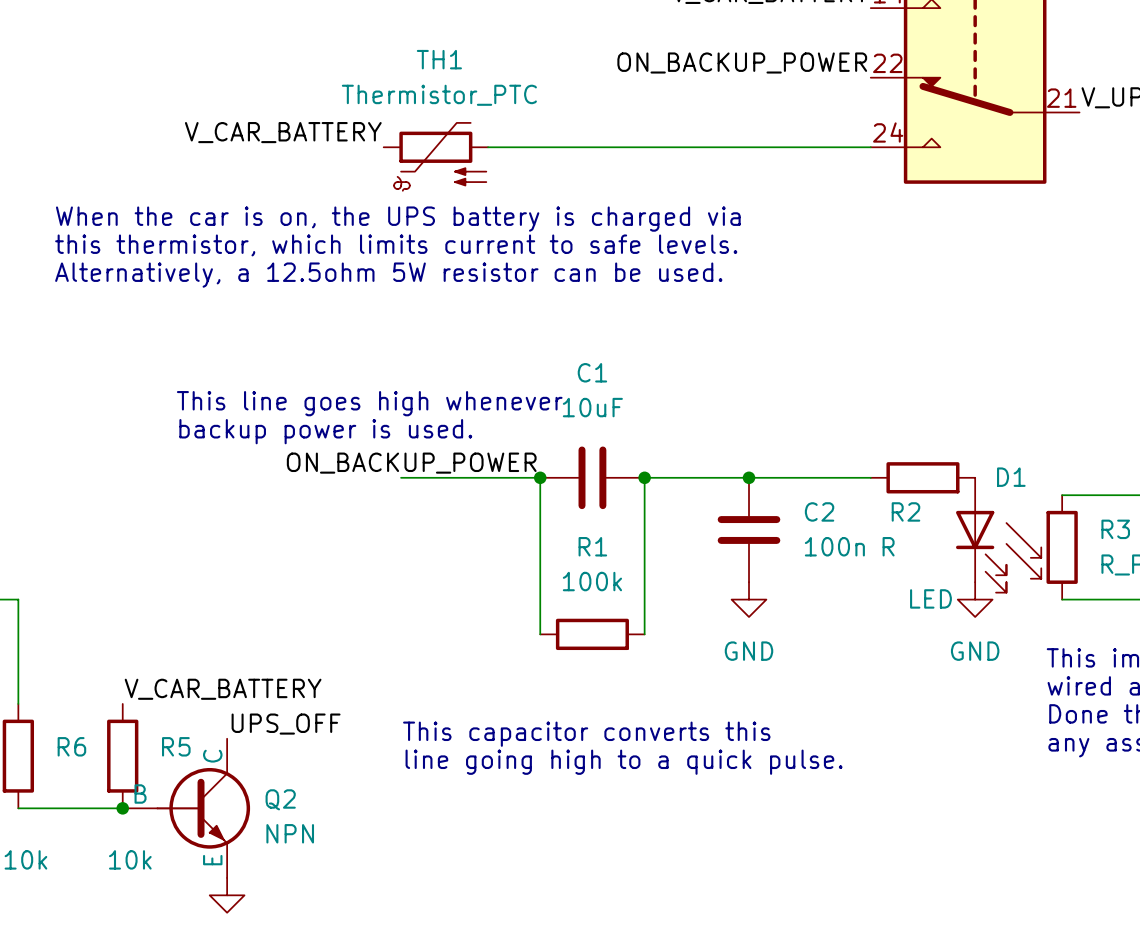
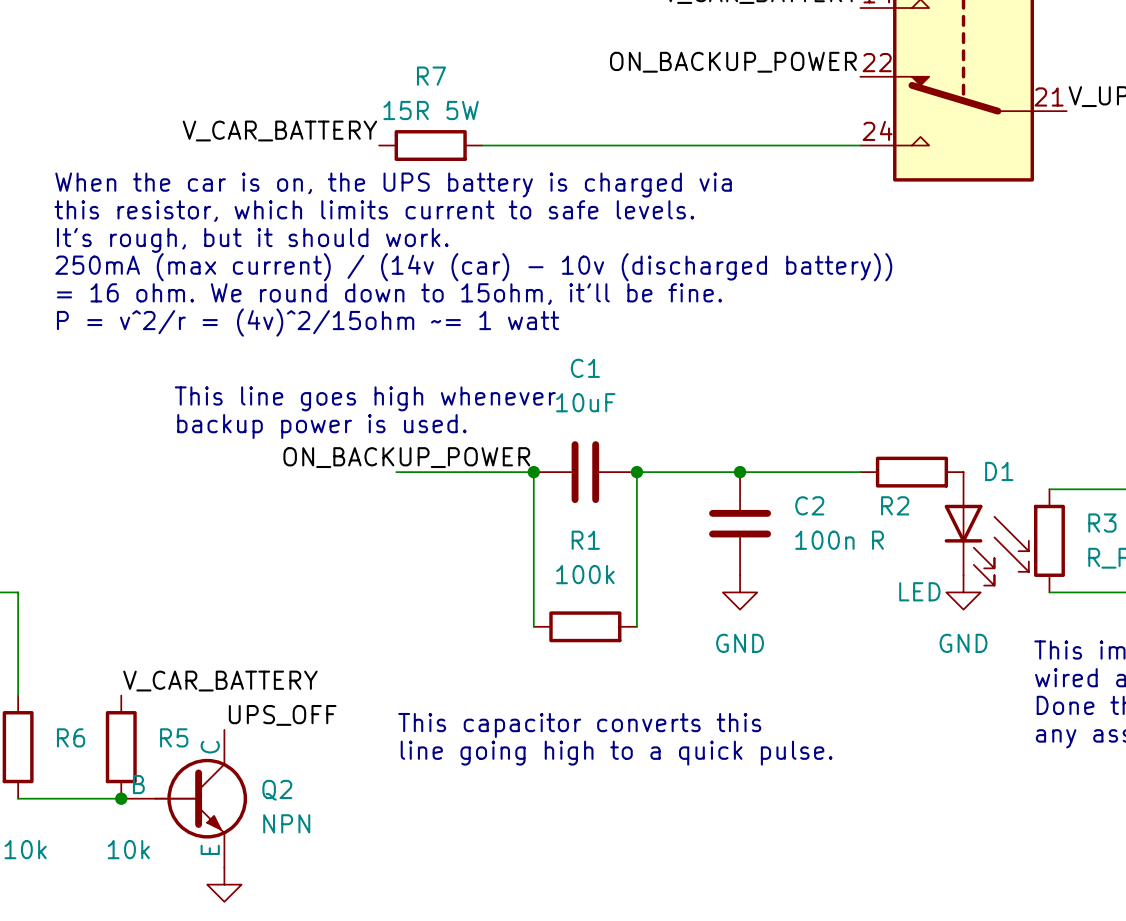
R7: none -> 15R 5W (430, 145)
TH1: Thermistor_PTC (435, 156) -> none
text: none -> When the car is on, the UPS battery is charged via (393, 185)
text: When the car is on, the UPS battery is charged via (398, 219) -> this resistor, which limits current to safe levels. (374, 211)
text: this thermistor, which limits current to safe levels. (396, 245) -> It's rough, but it should work. (252, 240)
text: Alternatively, a 12.5ohm 5W resistor can be used. (388, 275) -> 250mA (max current) / (14v (car) - 10v (discharged battery)) (473, 267)
text: none -> = 16 ohm. We round down to 15ohm, it'll be fine. (389, 294)
text: none -> P = v^2/r = (4v)^2/15ohm ~= 1 watt (308, 322)

